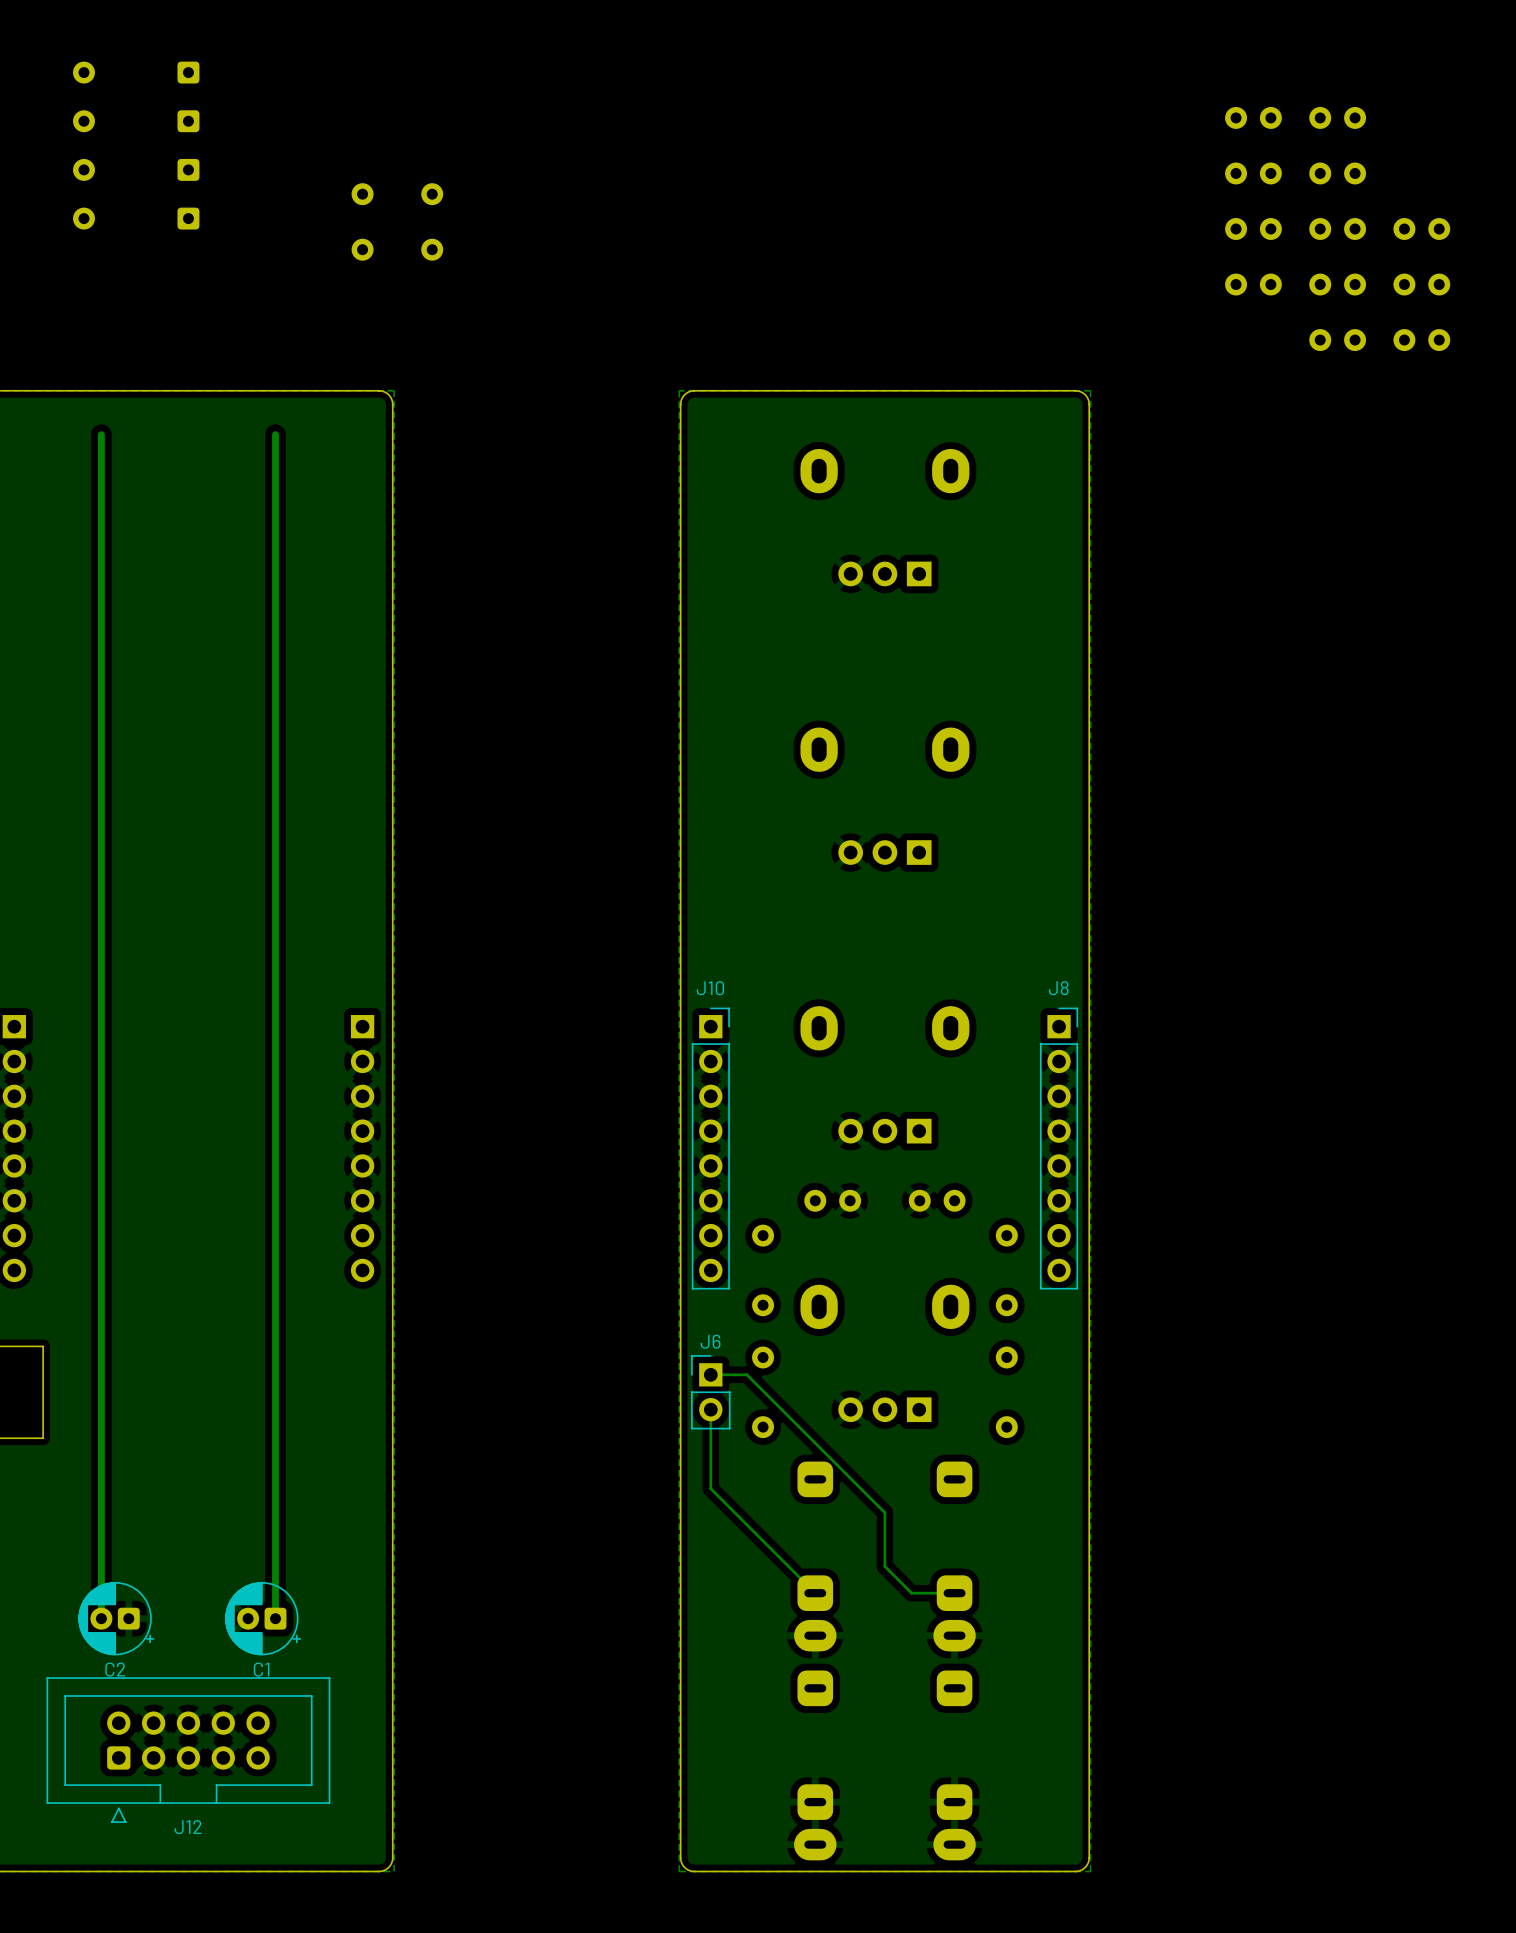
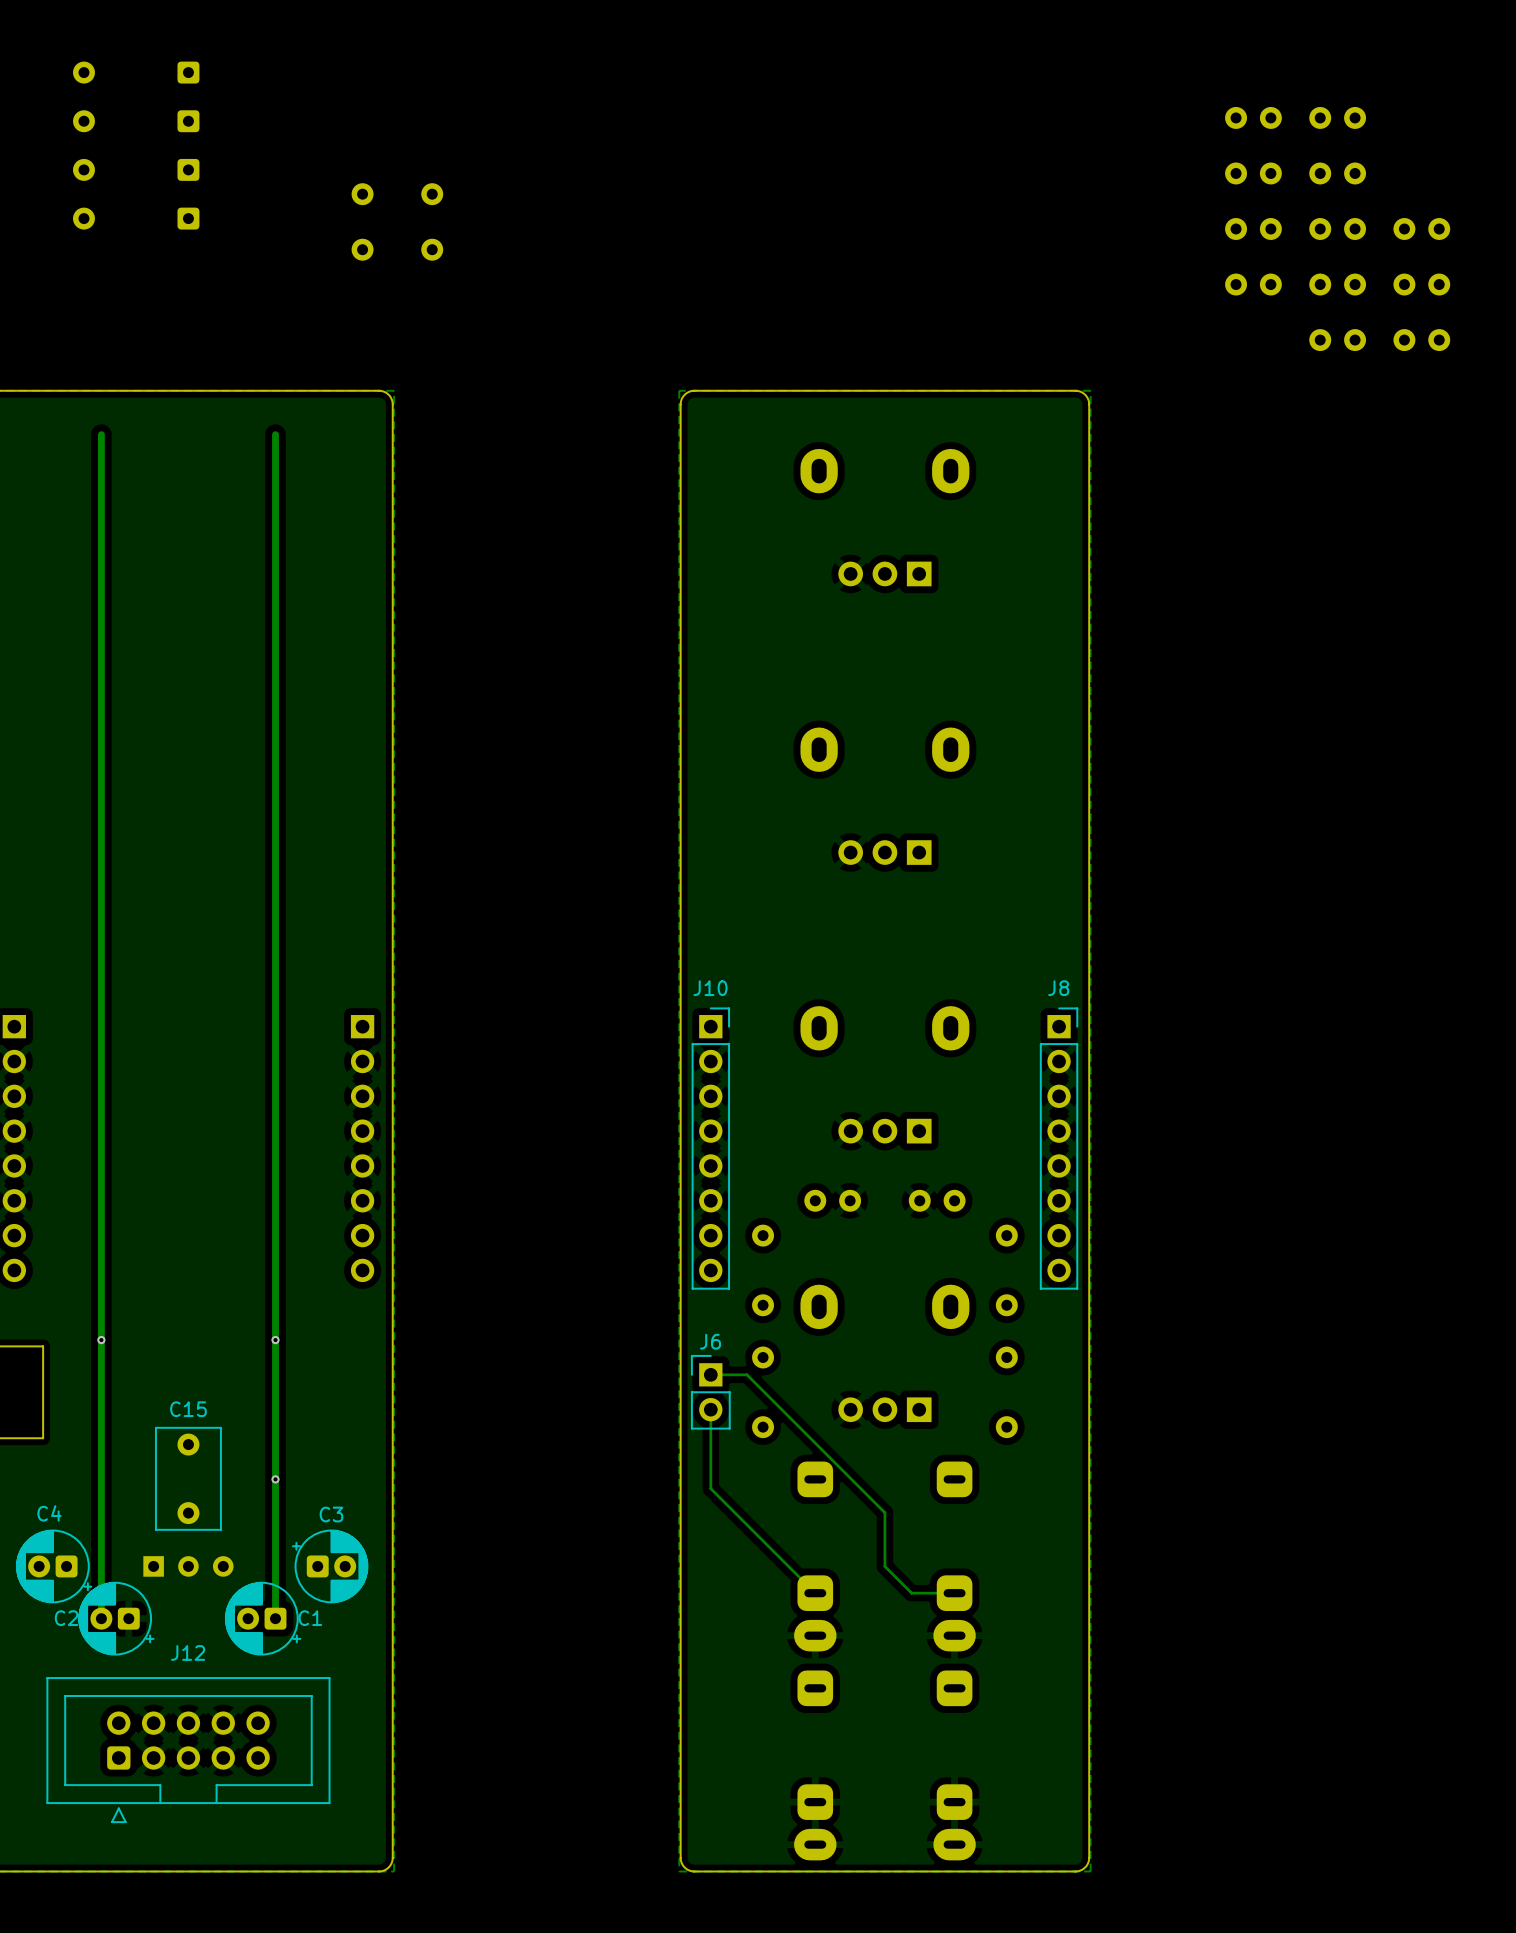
via: none -> (101, 1340)
via: none -> (275, 1340)
C15: none -> (188, 1478)
via: none -> (275, 1479)
C4: none -> (54, 1566)
part: none -> (188, 1566)
C3: none -> (330, 1566)
C2 name position: C2 (115, 1669) -> C2 (66, 1618)
C1 name position: C1 (261, 1669) -> C1 (310, 1618)
J12 name position: J12 (188, 1827) -> J12 (188, 1652)

